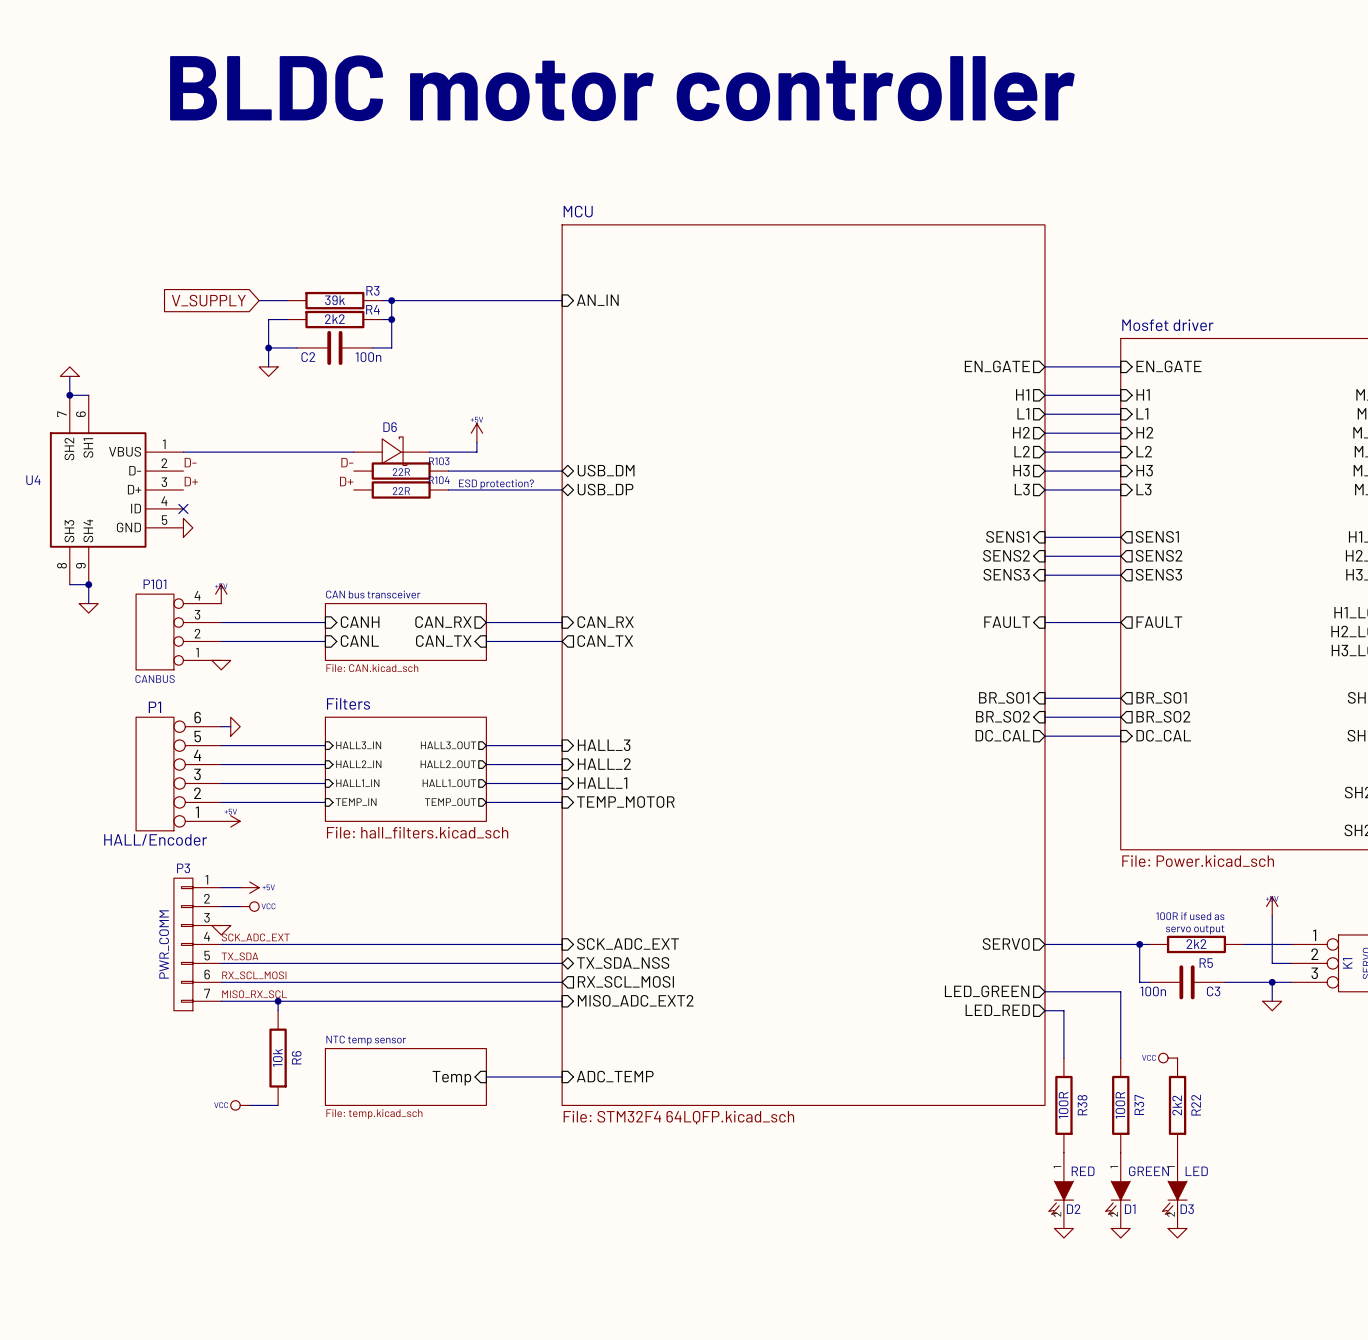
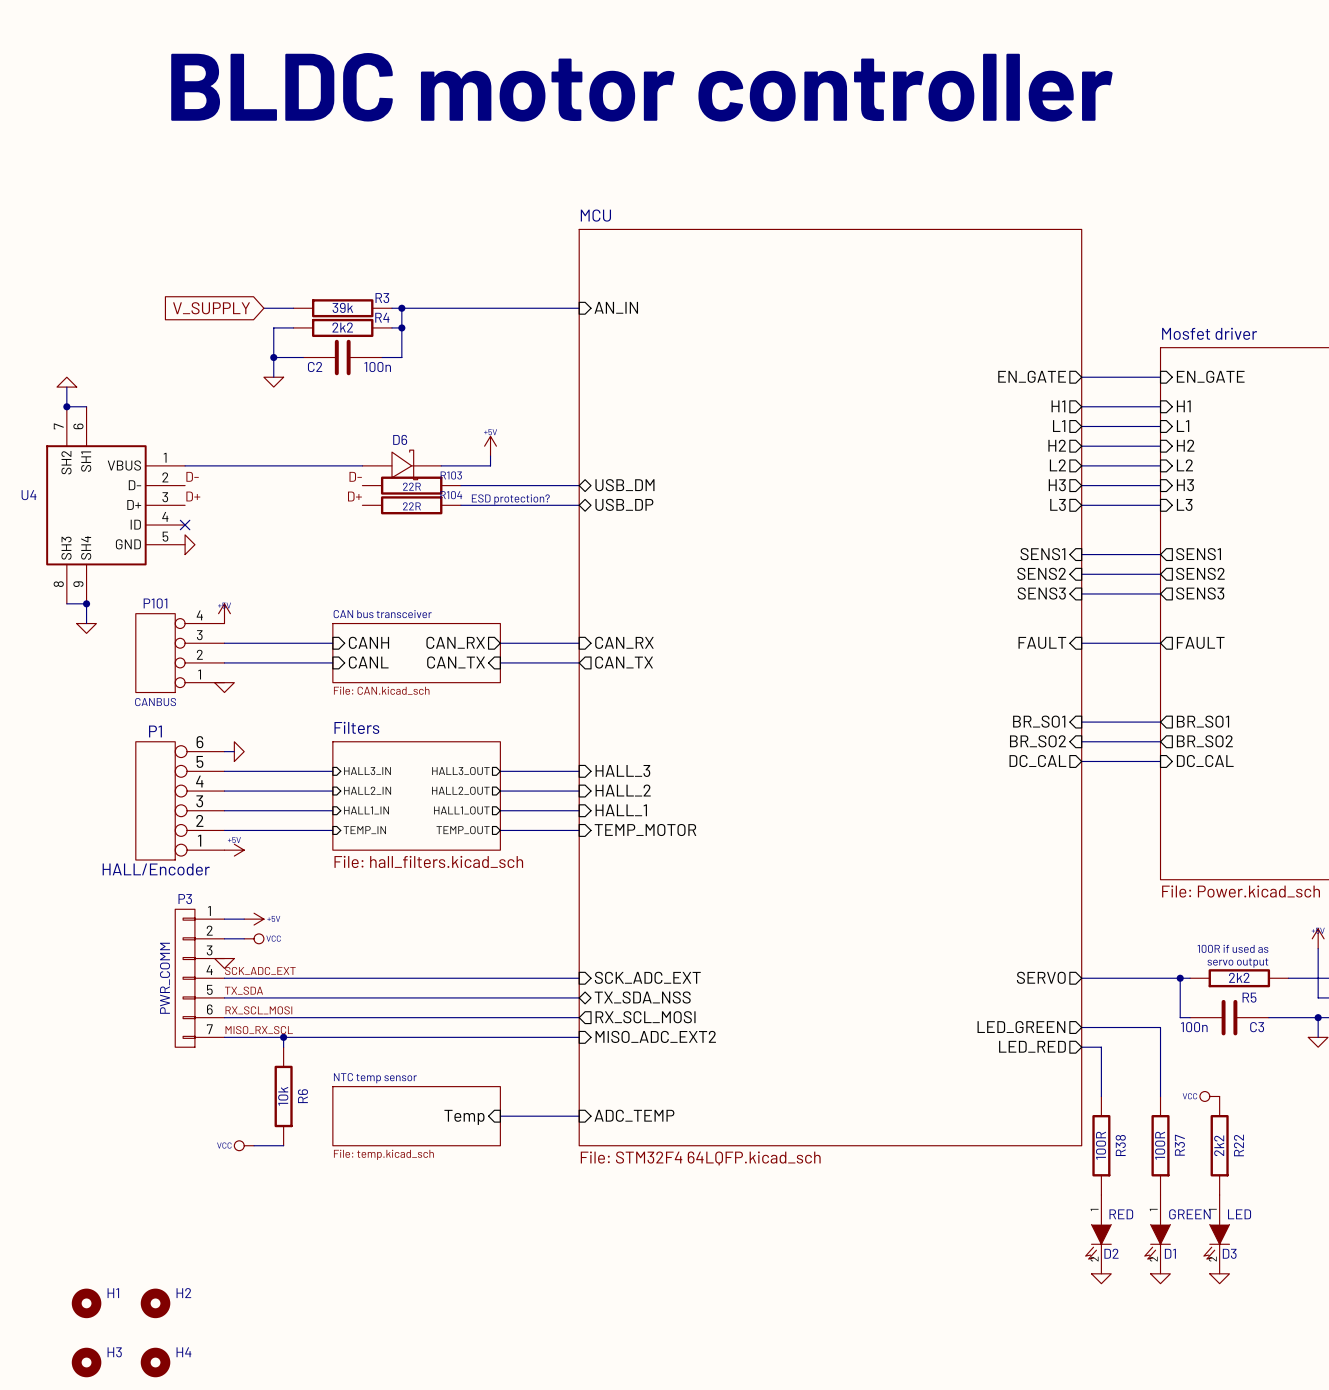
H1: none -> (86, 1303)
H2: none -> (155, 1303)
H3: none -> (86, 1362)
H4: none -> (155, 1362)

